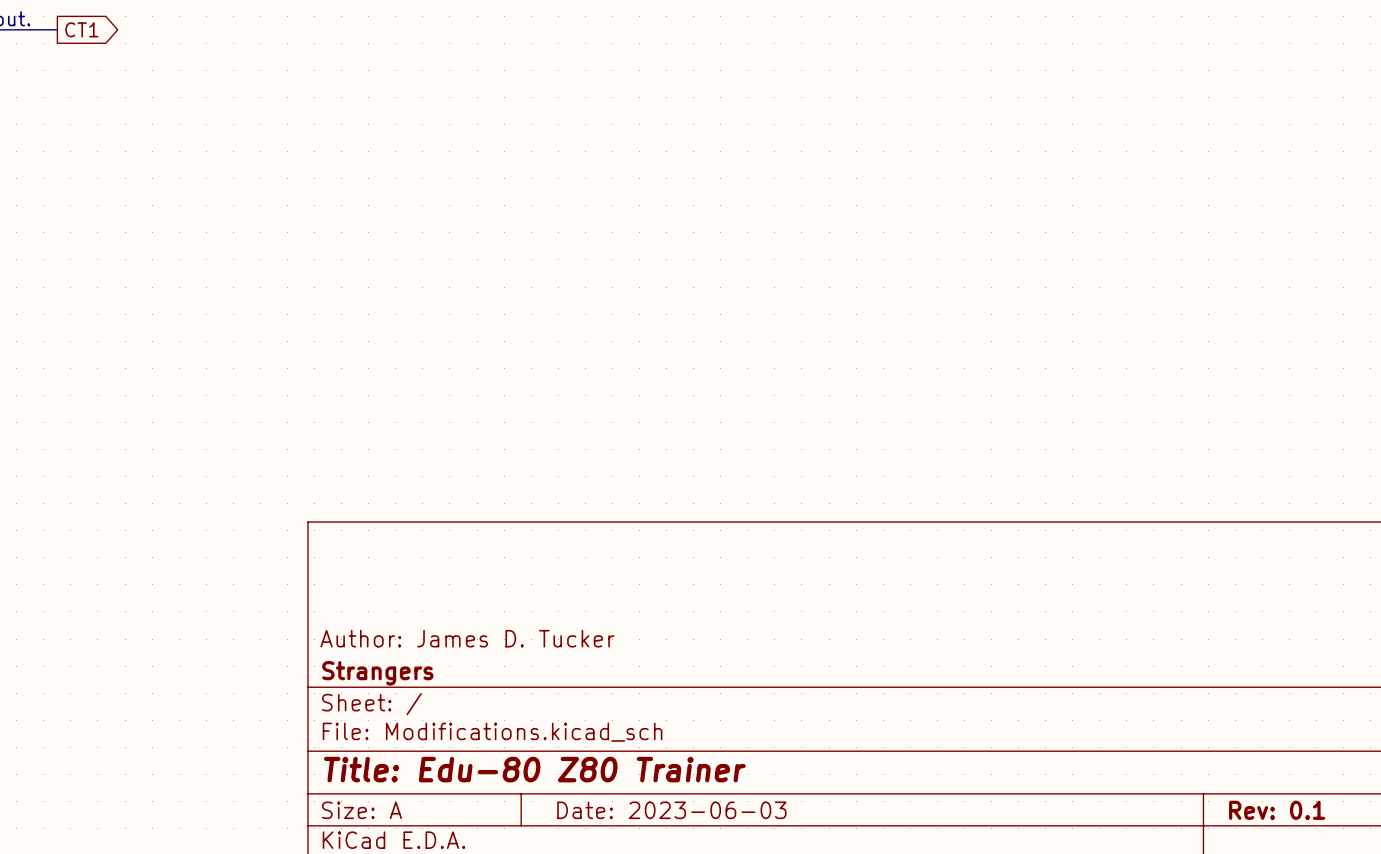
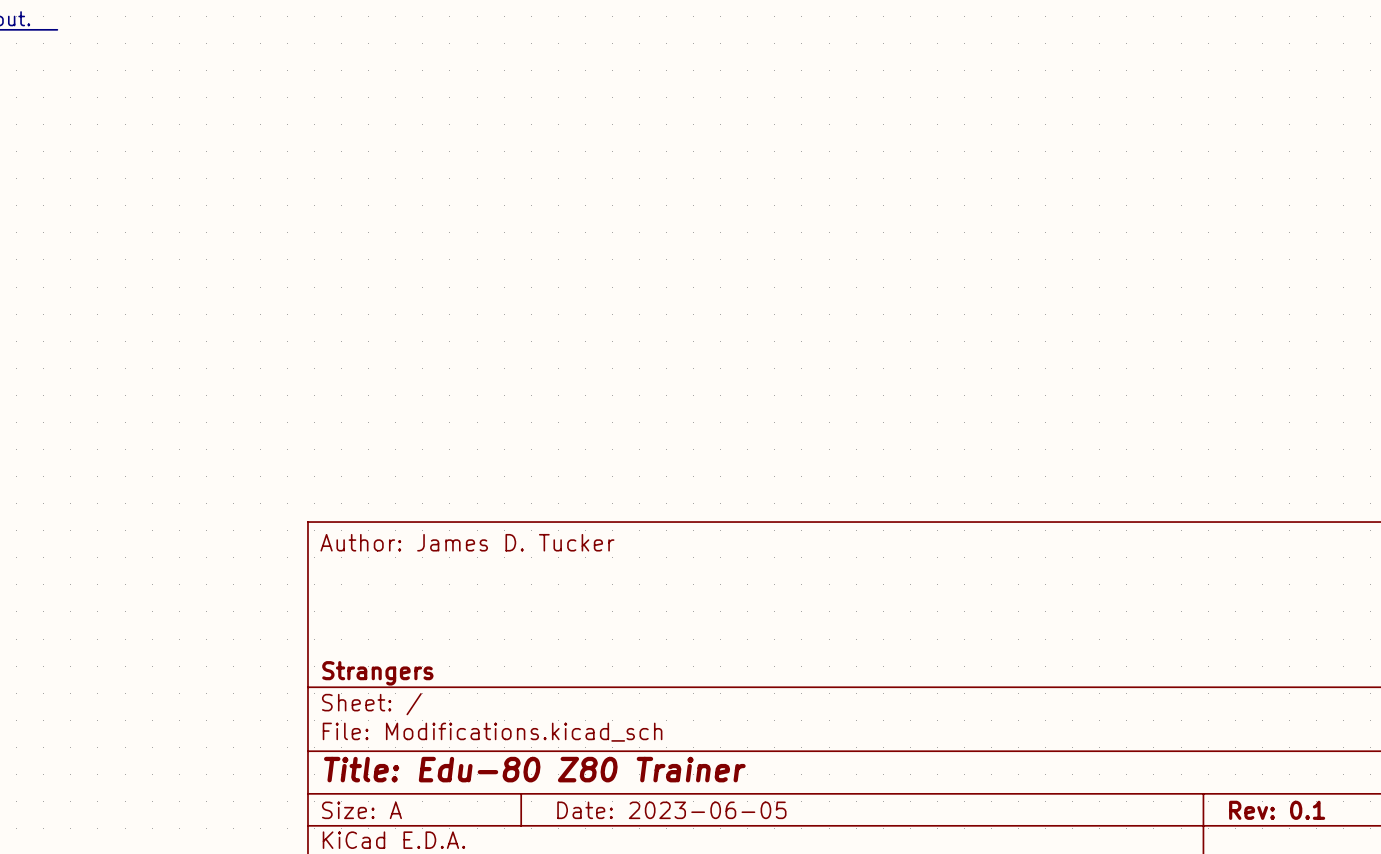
global label: CT1 (81, 29) -> none
title block position: Author: James D. Tucker (467, 638) -> Author: James D. Tucker (467, 542)
title block: Date: 2023-06-03 (671, 810) -> Date: 2023-06-05 (671, 810)

